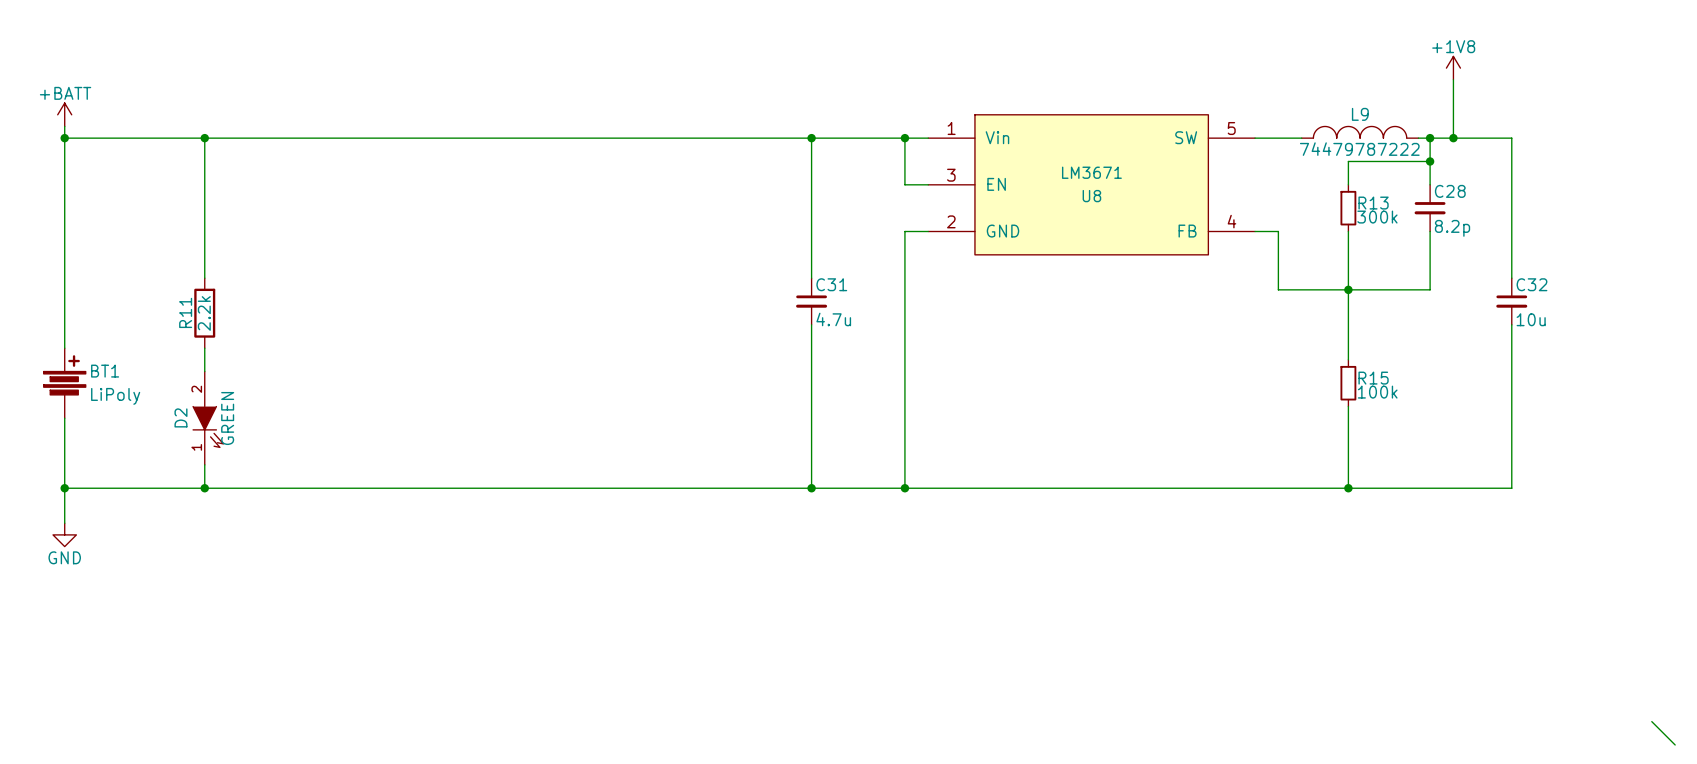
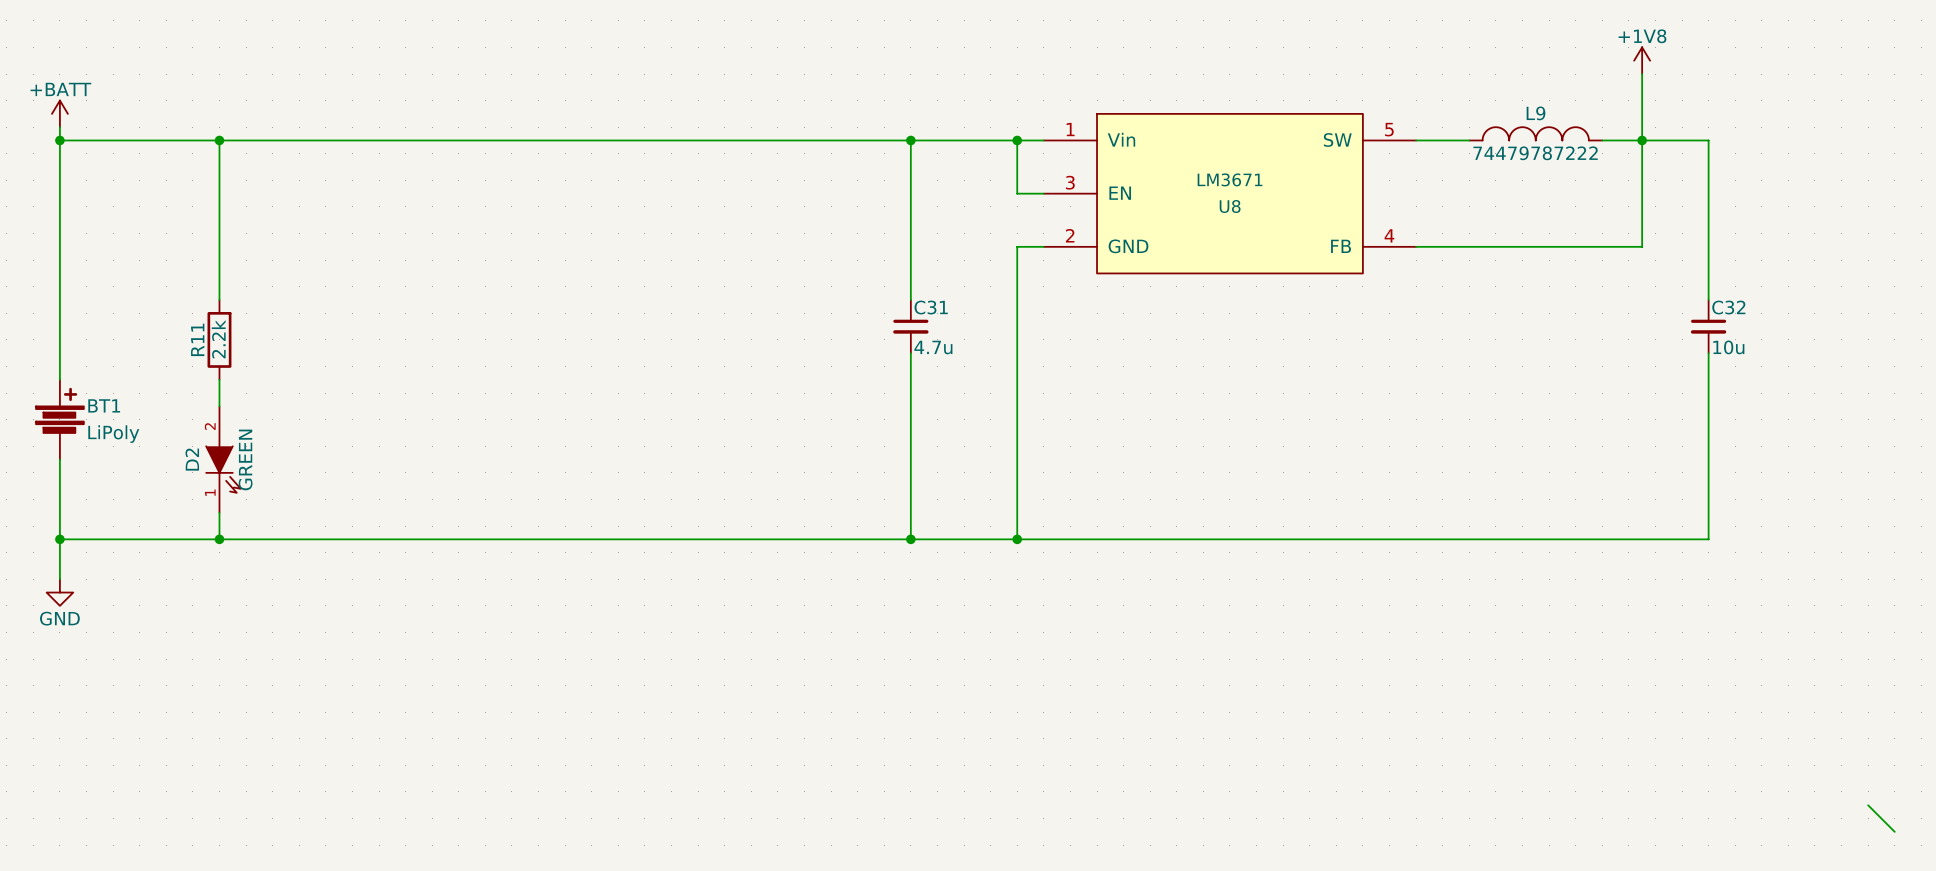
wire: (1430, 138) (1430, 184) -> none
junction: (1430, 138) -> none
wire: (1430, 161) (1348, 161) (1348, 184) -> none
junction: (1430, 161) -> none
R13: 300k (1348, 208) -> none
C28: 8.2p (1430, 208) -> none
wire: (1278, 231) (1278, 289) (1430, 289) (1430, 231) -> (1442, 246) (1642, 246) (1642, 140)
wire: (1348, 231) (1348, 359) -> none
junction: (1348, 289) -> none
R15: 100k (1348, 383) -> none
wire: (1348, 406) (1348, 488) -> none
junction: (1348, 488) -> none

